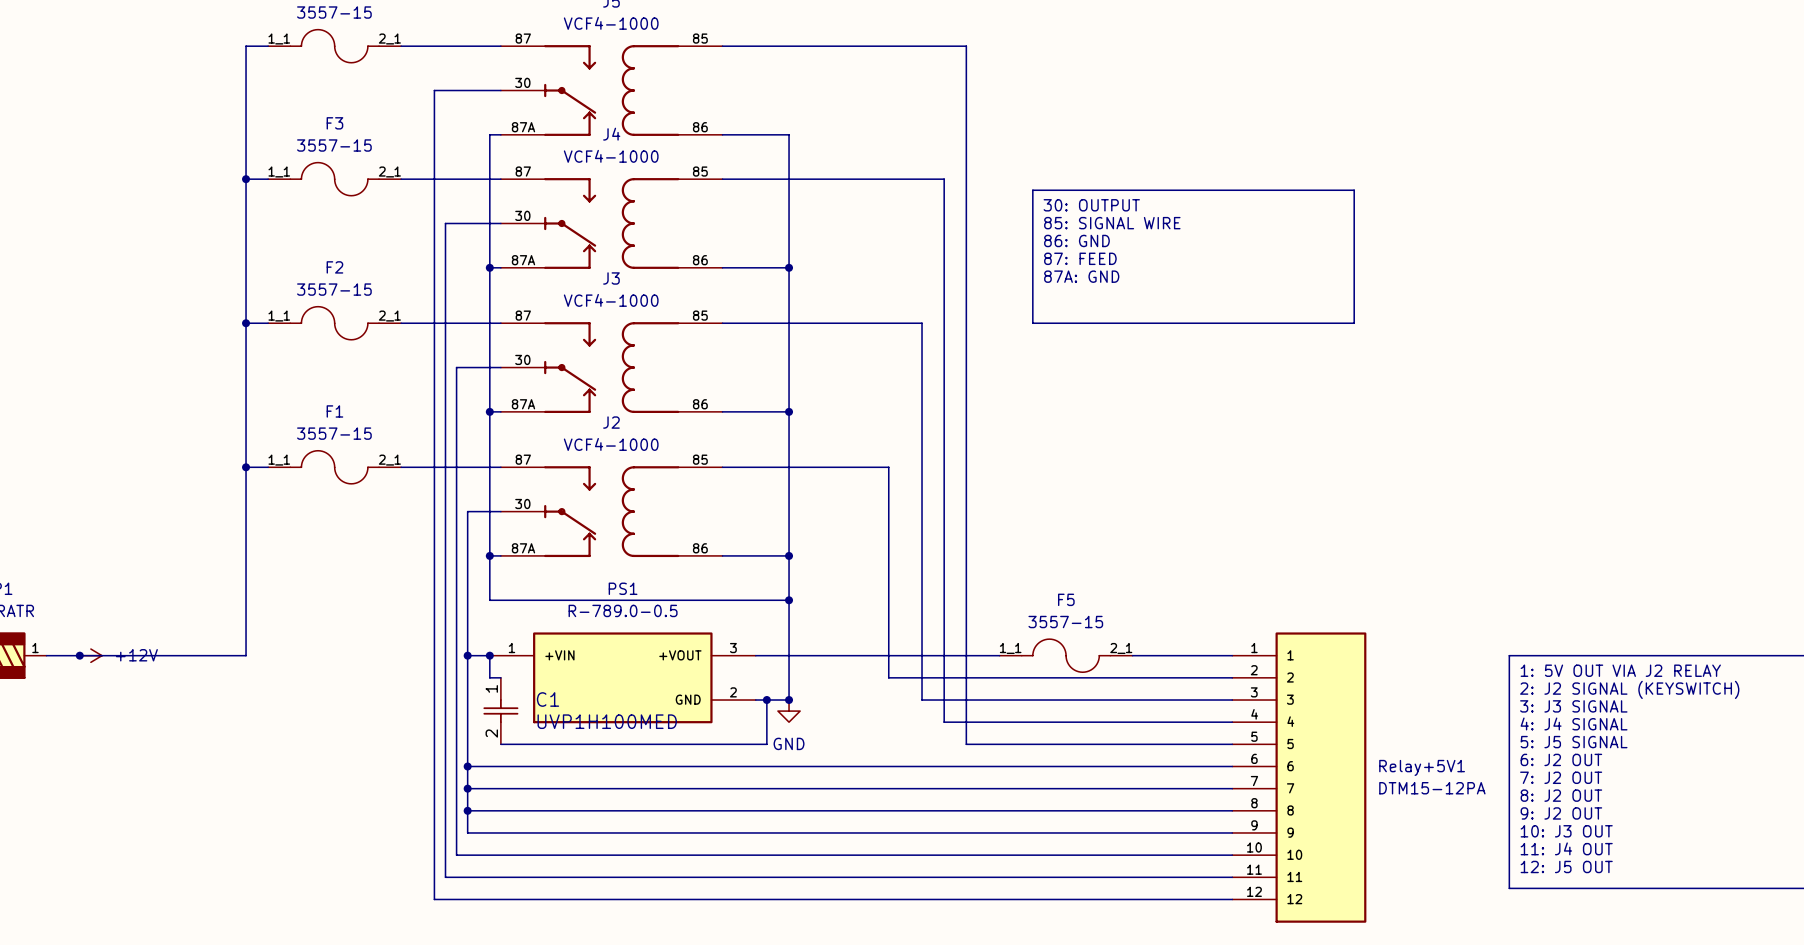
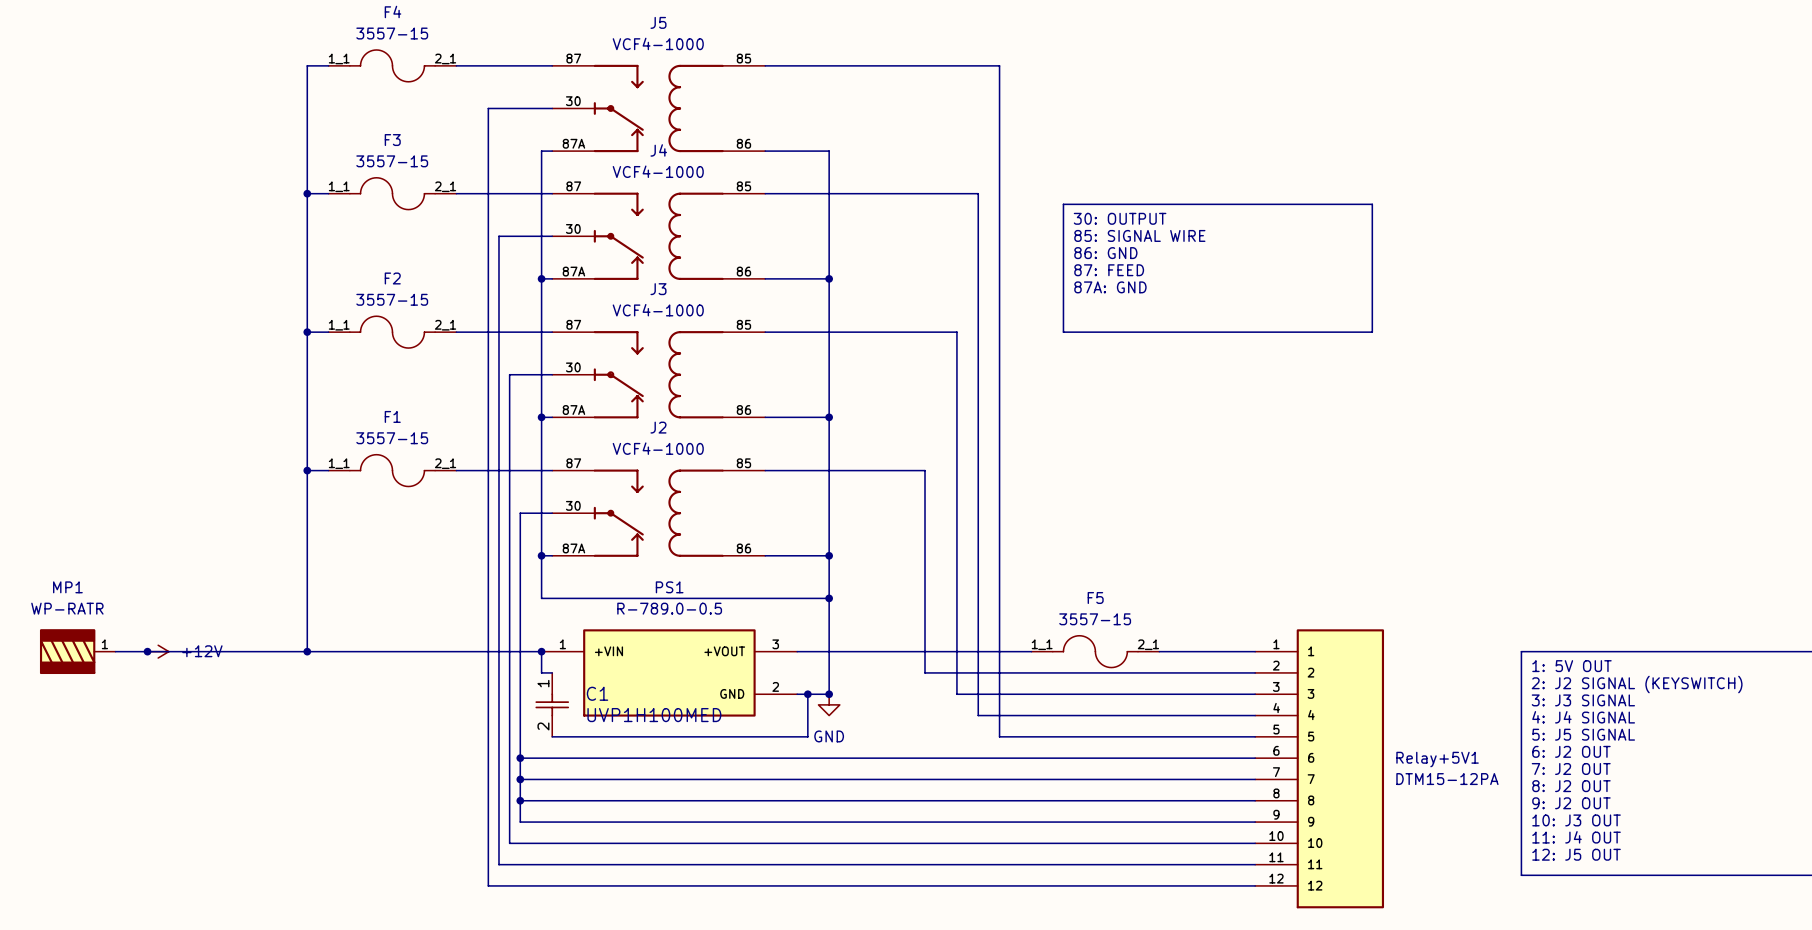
wire: none -> (307, 651) (520, 651)
junction: none -> (307, 651)
junction: (467, 655) -> none
text: 1: 5V OUT VIA J2 RELAY (1620, 670) -> 1: 5V OUT (1571, 666)

